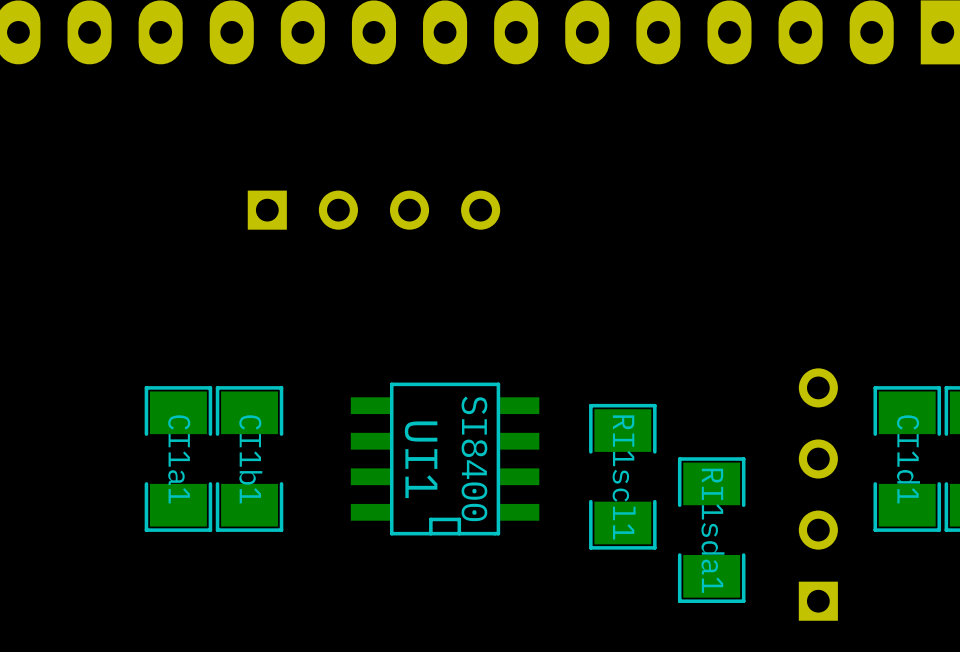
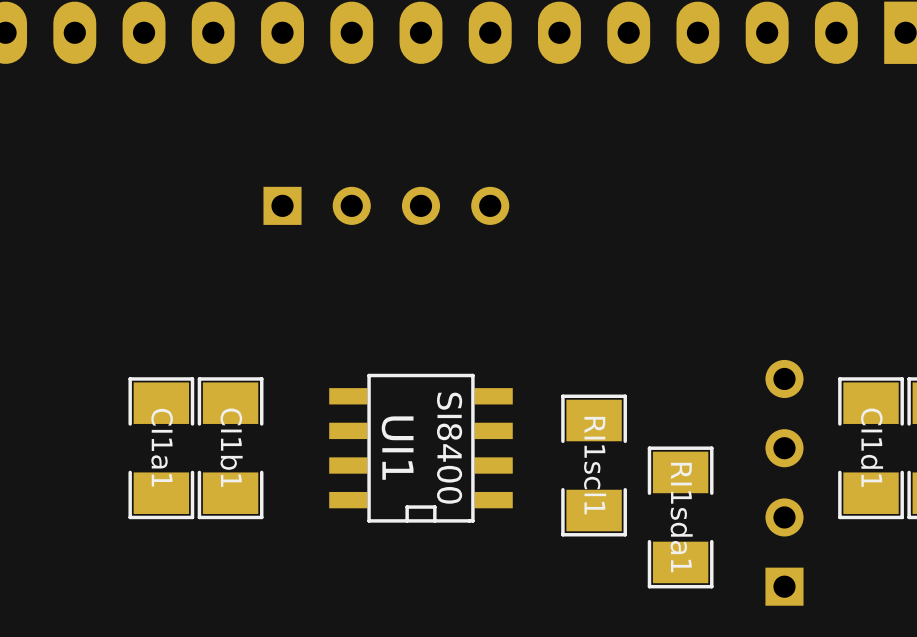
part position: (373, 210) -> (386, 205)

